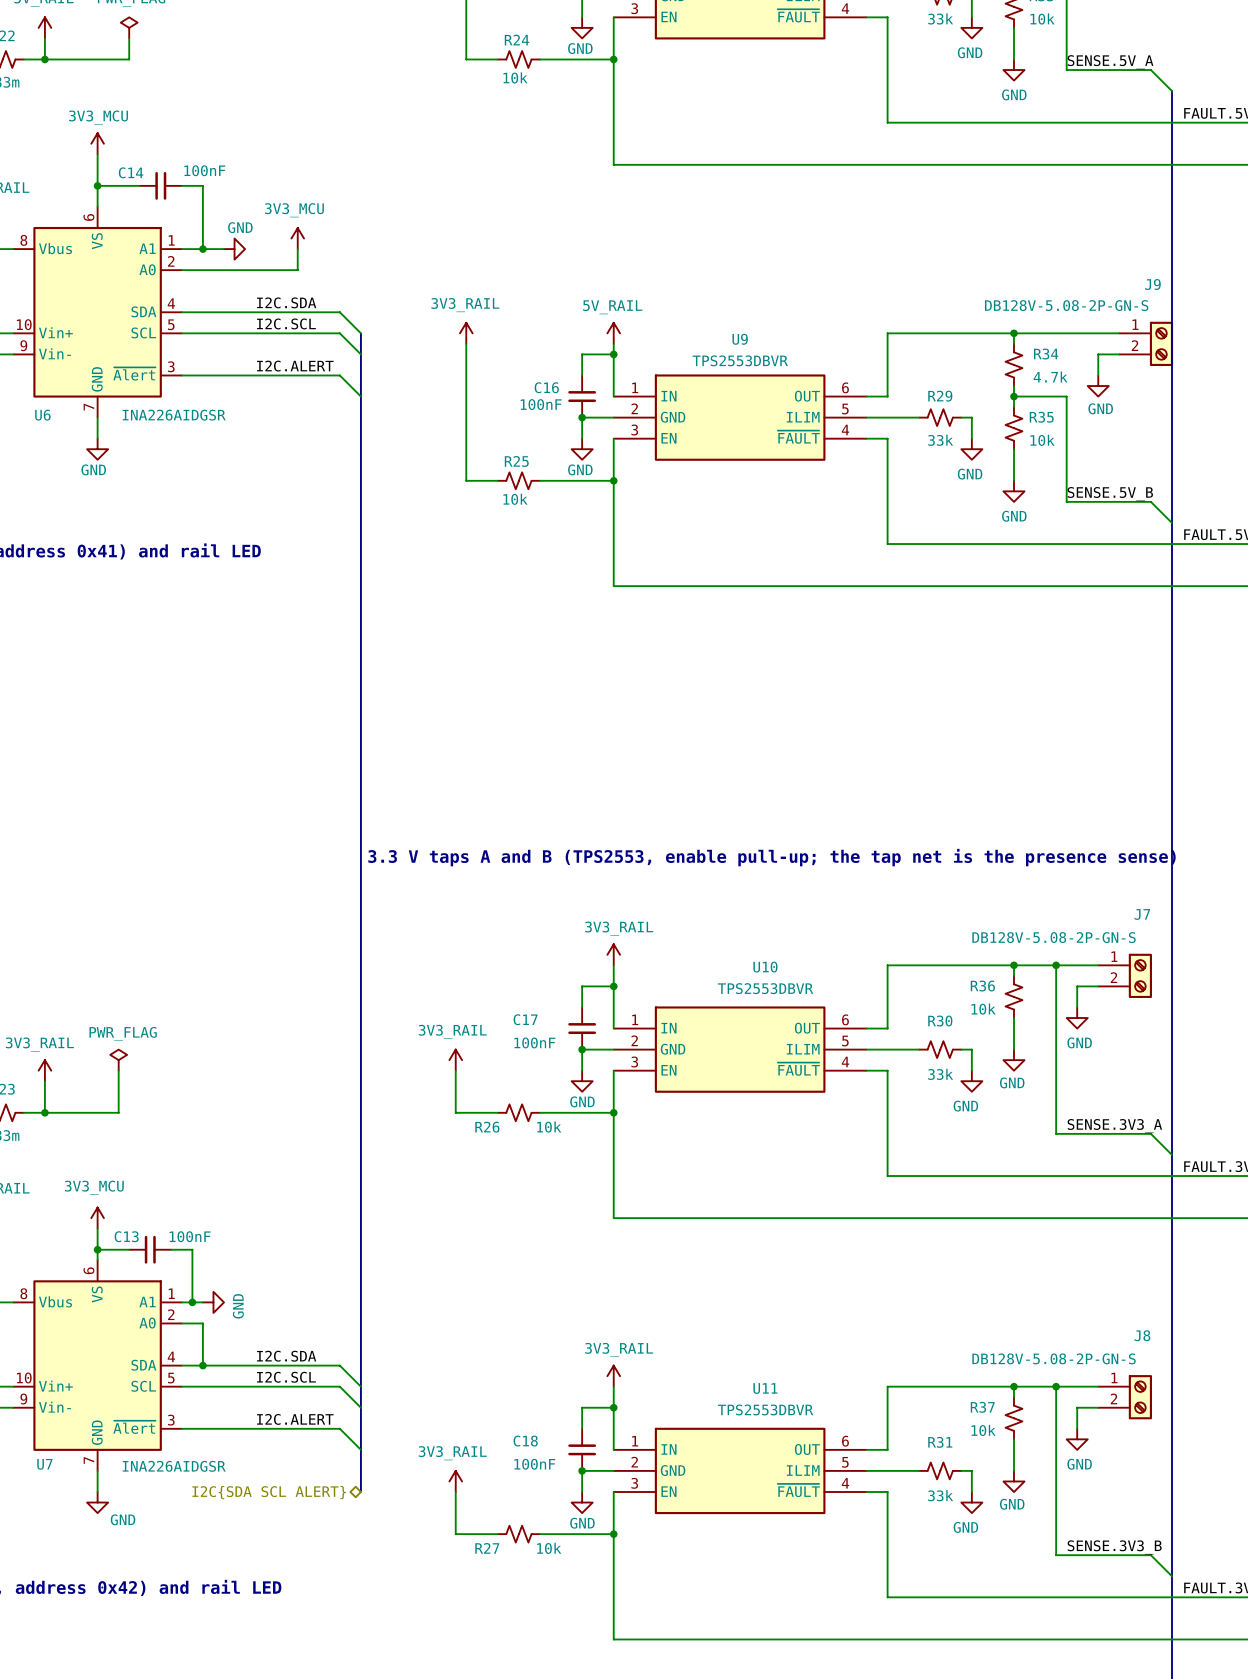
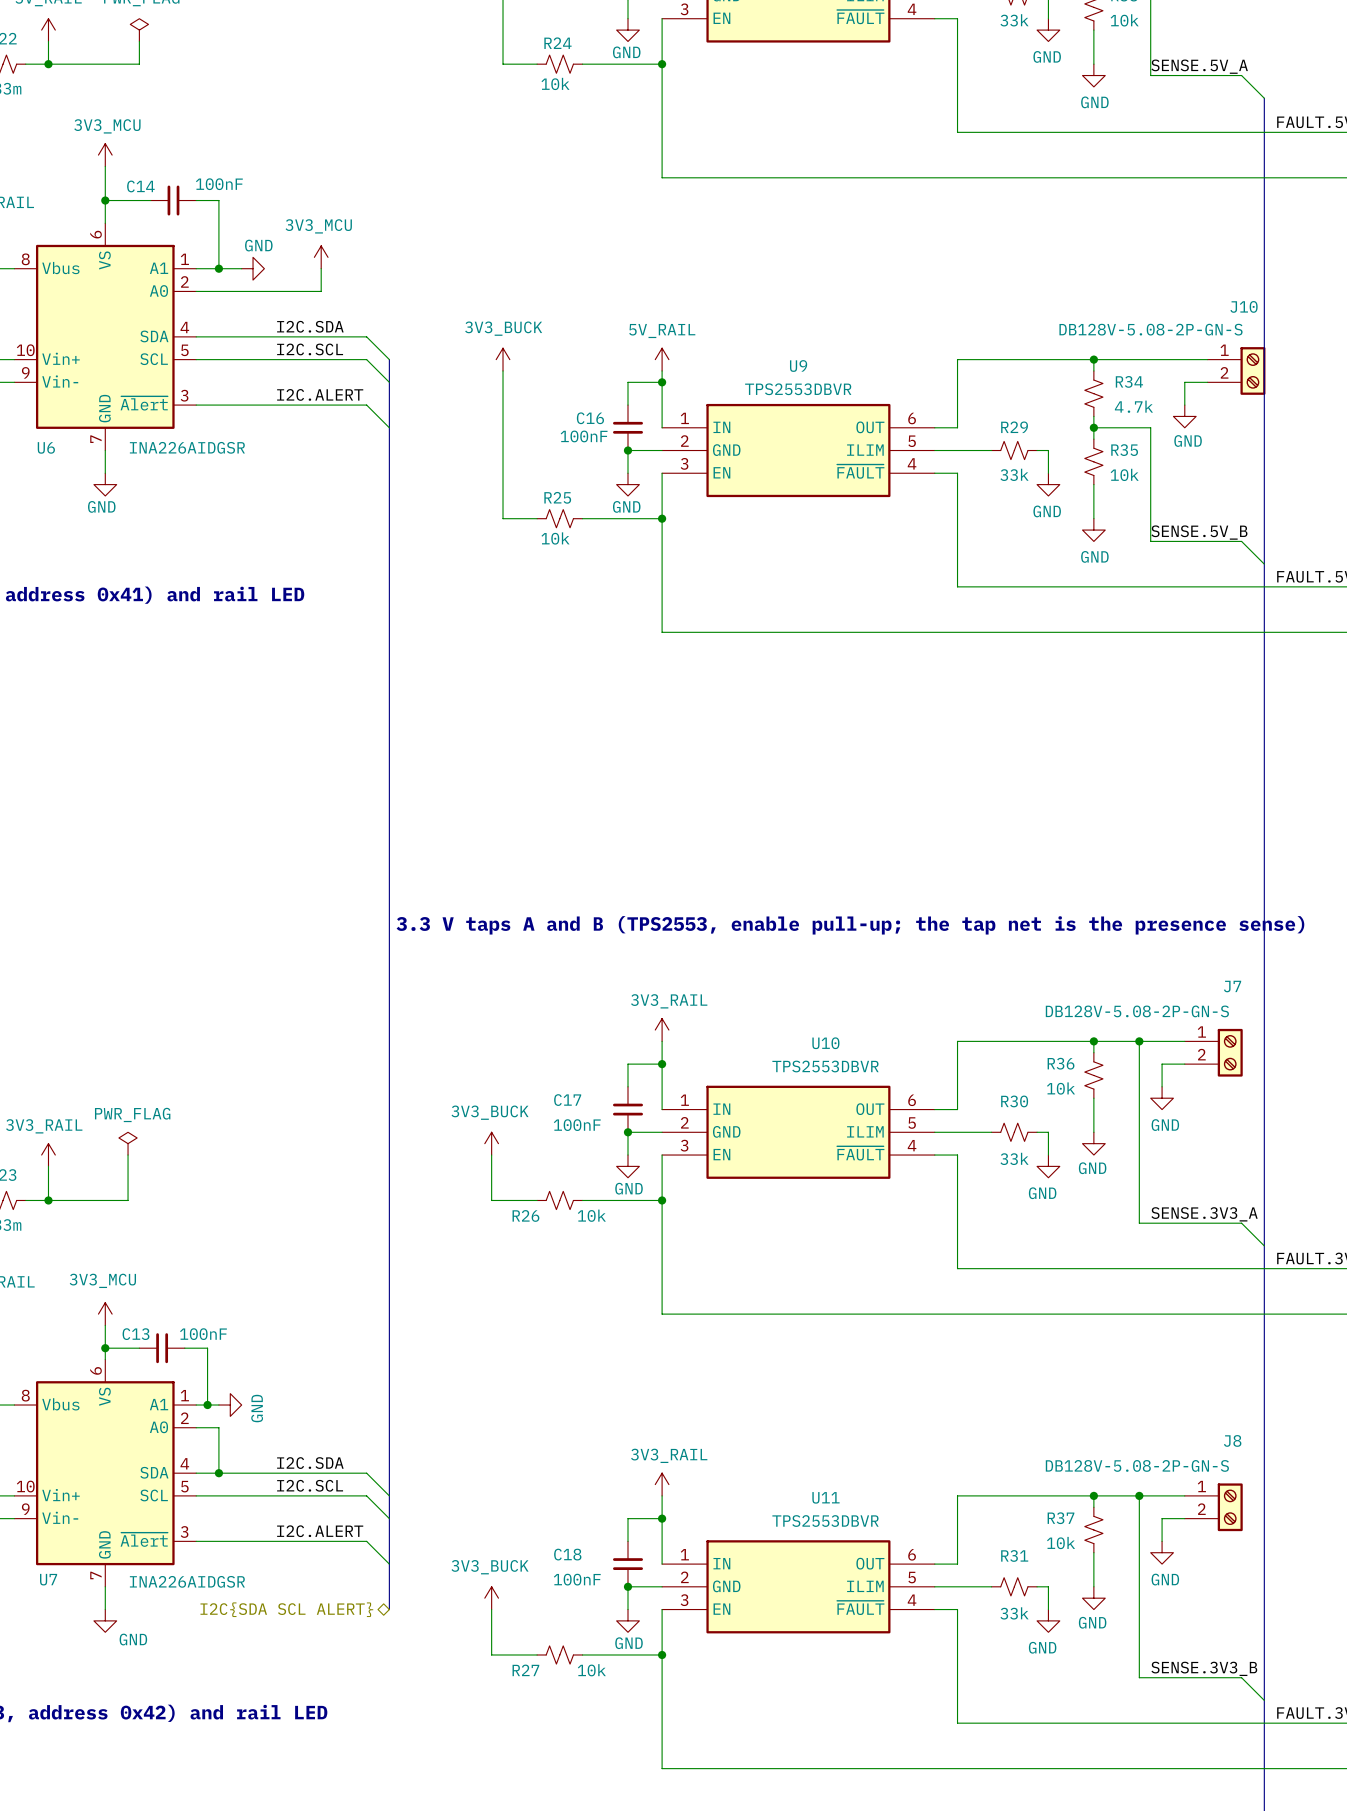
J9 name: J9 (1152, 284) -> J10 (1244, 306)
power symbol: 3V3_RAIL (466, 333) -> 3V3_BUCK (503, 359)
power symbol: 3V3_RAIL (455, 1060) -> 3V3_BUCK (491, 1143)
power symbol: 3V3_RAIL (455, 1481) -> 3V3_BUCK (491, 1598)

